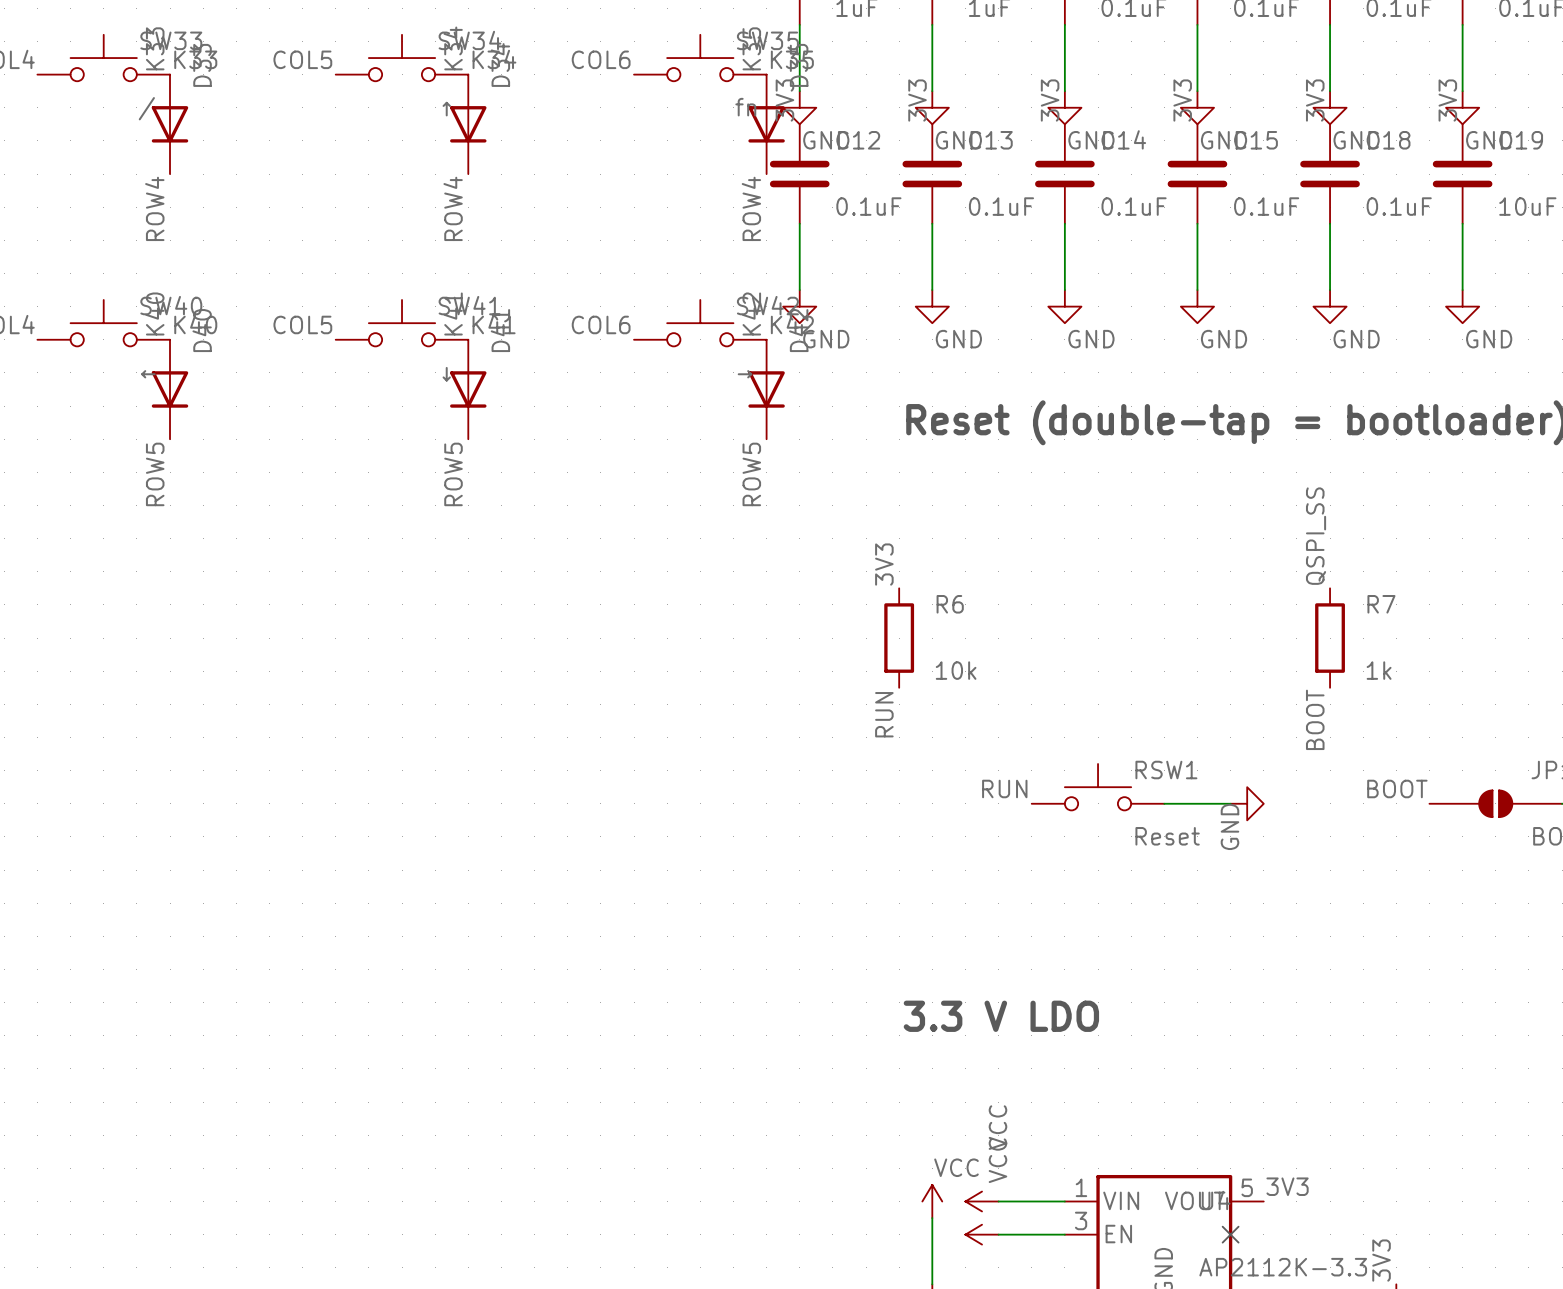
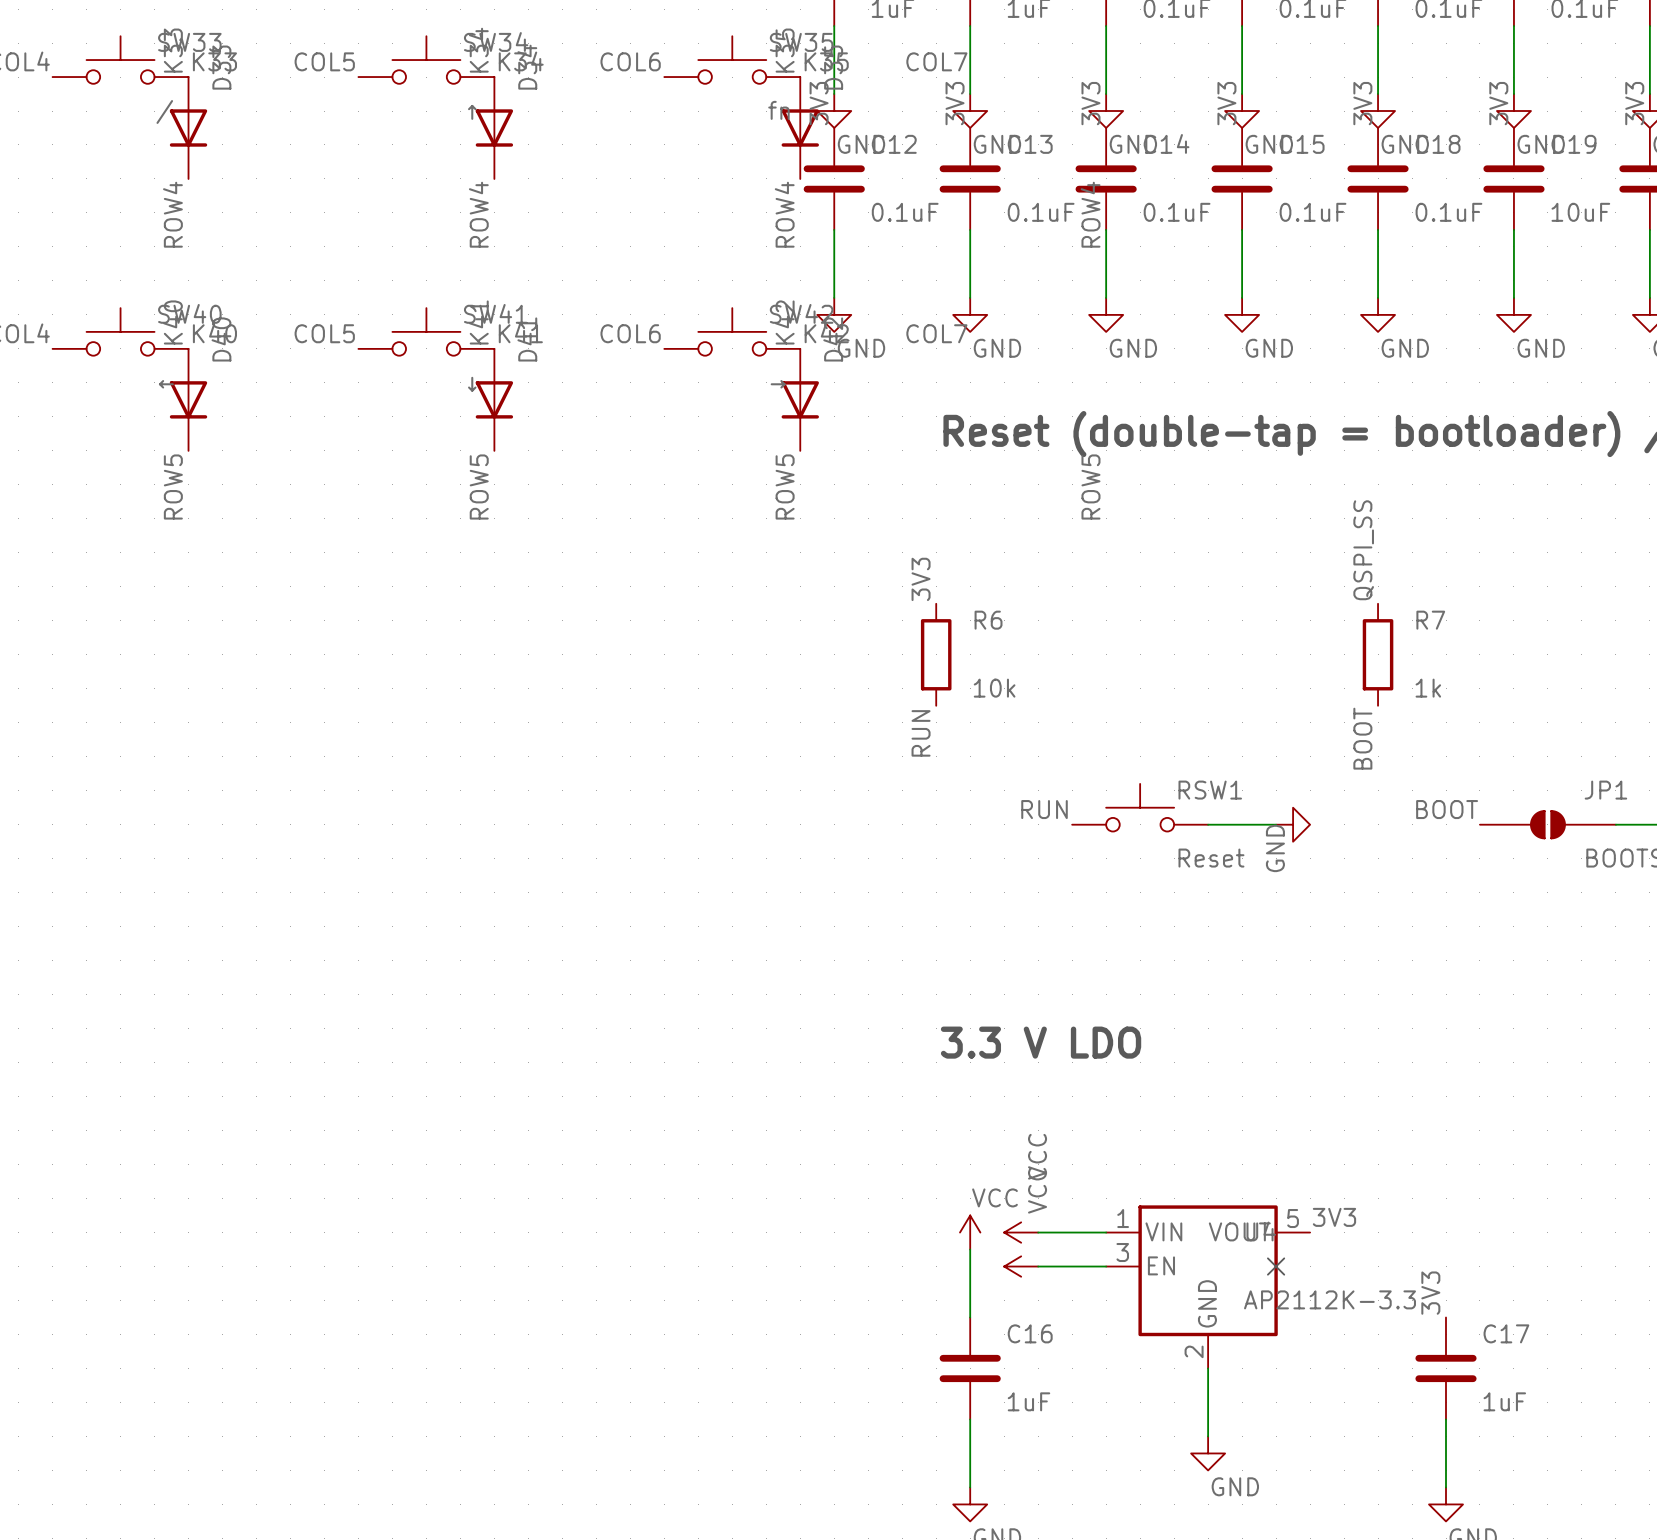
label: none -> COL7 (936, 61)
label: none -> ROW4 (1090, 214)
label: none -> COL7 (936, 333)
label: none -> ROW5 (1090, 487)

